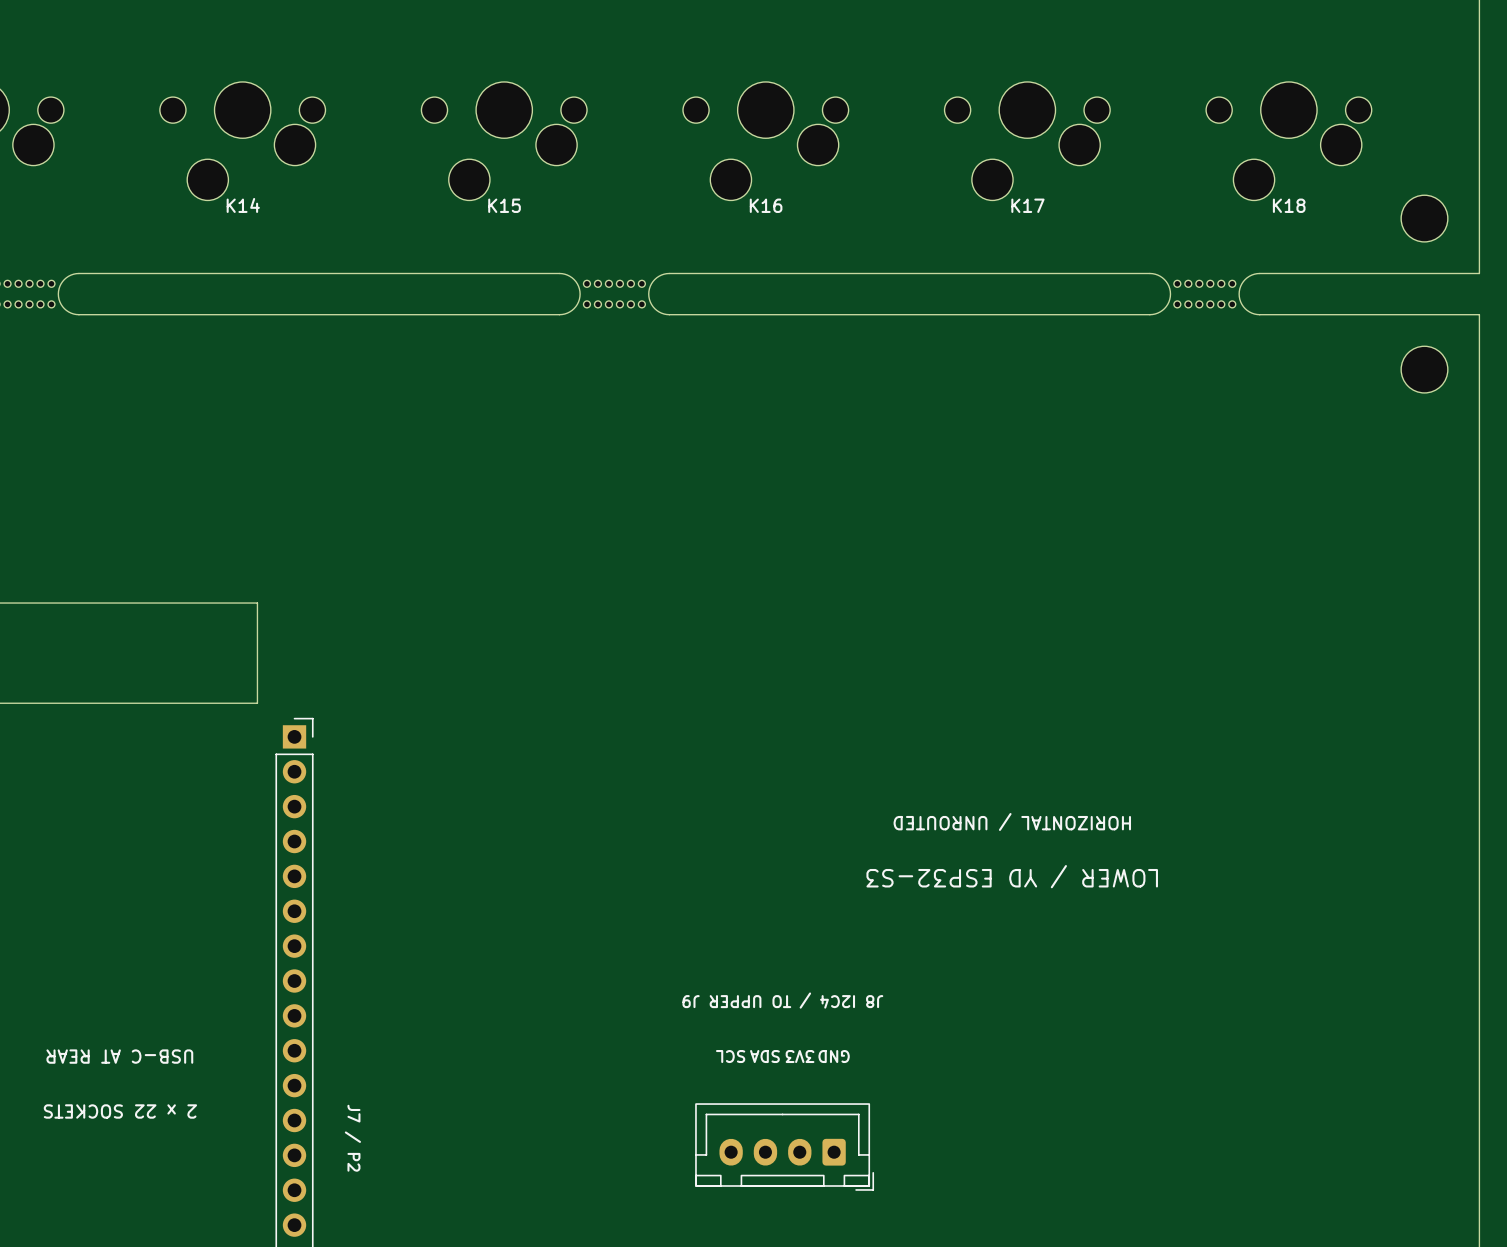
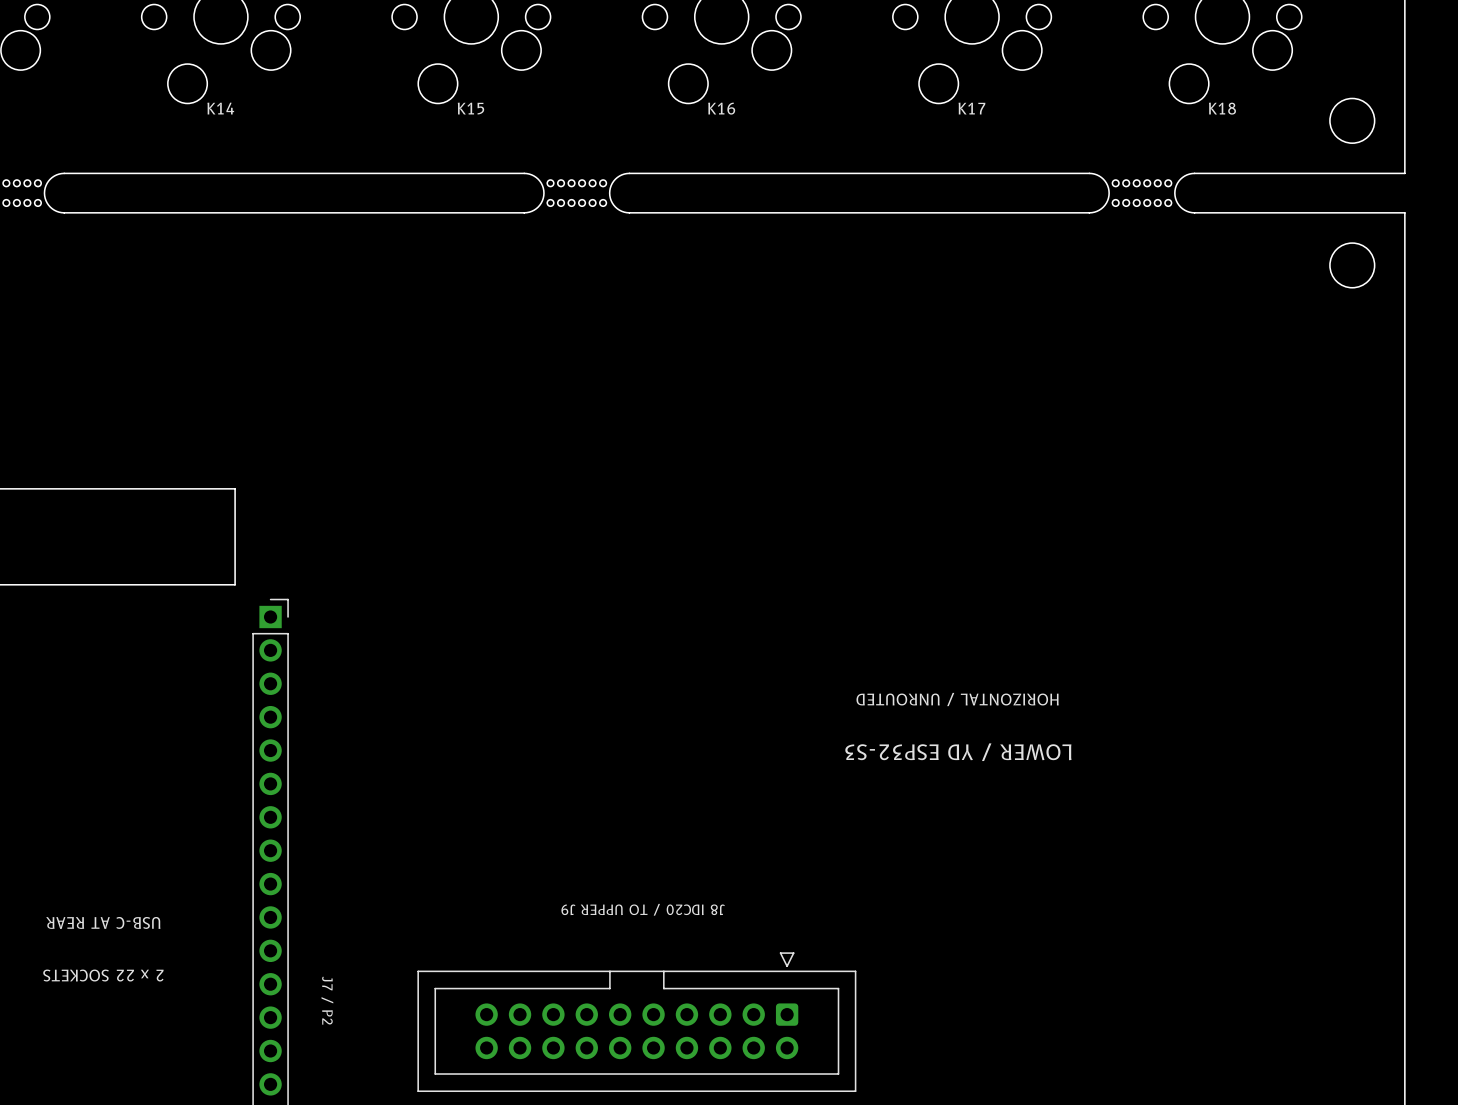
text: J8 I2C4 / TO UPPER J9 (782, 1000) -> none
text: none -> J8 IDC20 / TO UPPER J9 (643, 909)
text: SCL (730, 1056) -> none
text: SDA (764, 1056) -> none
text: 3V3 (800, 1056) -> none
text: GND (834, 1056) -> none
part: (784, 1147) -> none
part: none -> (636, 1022)

